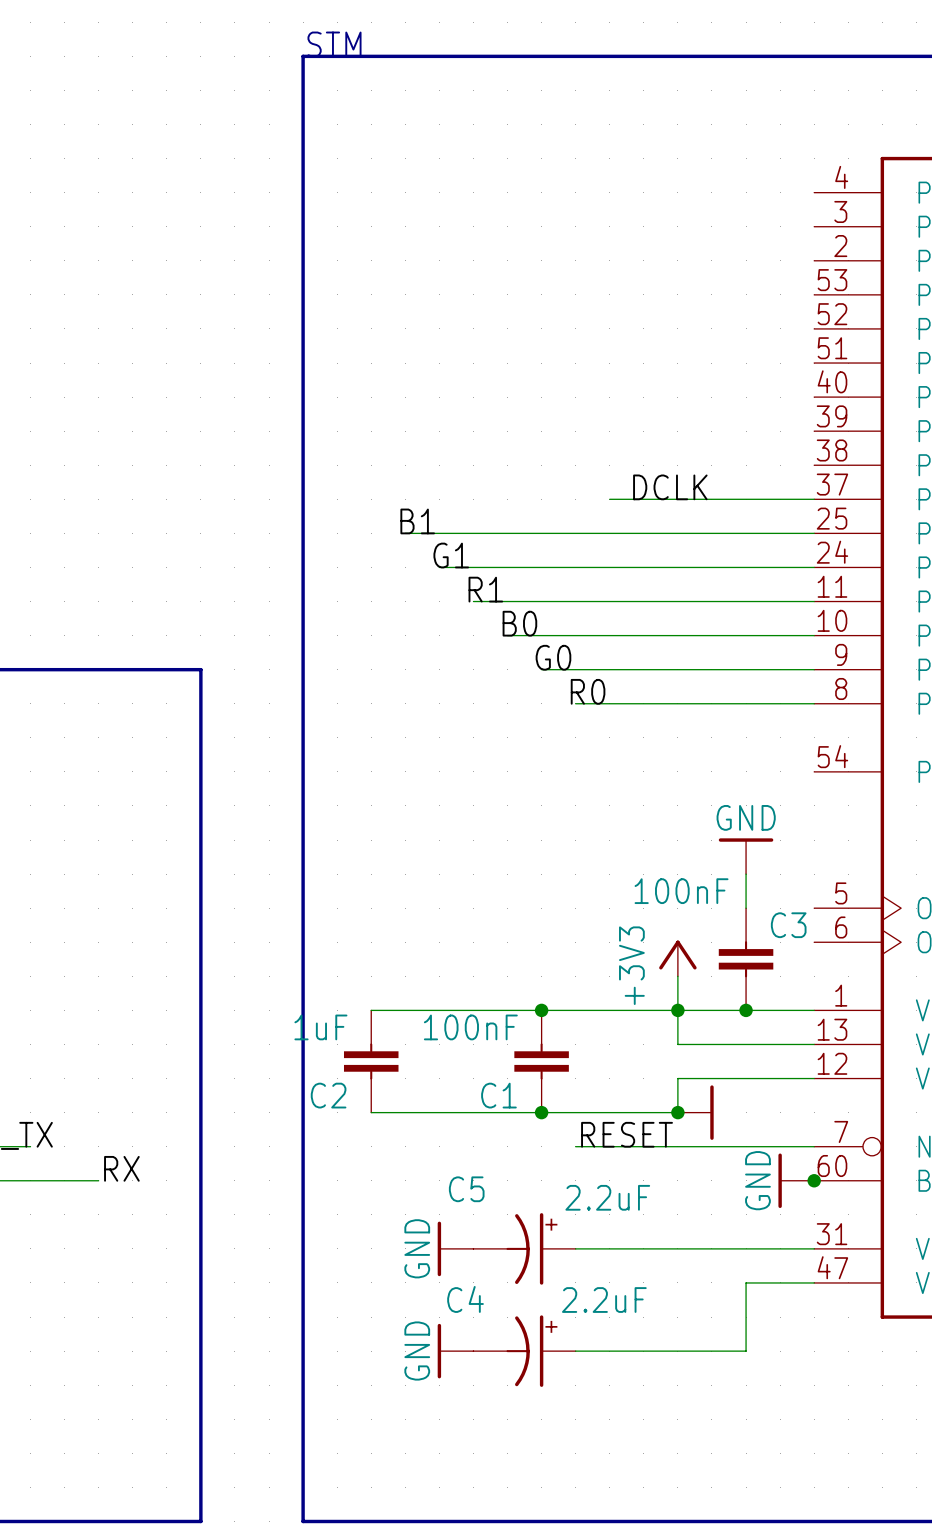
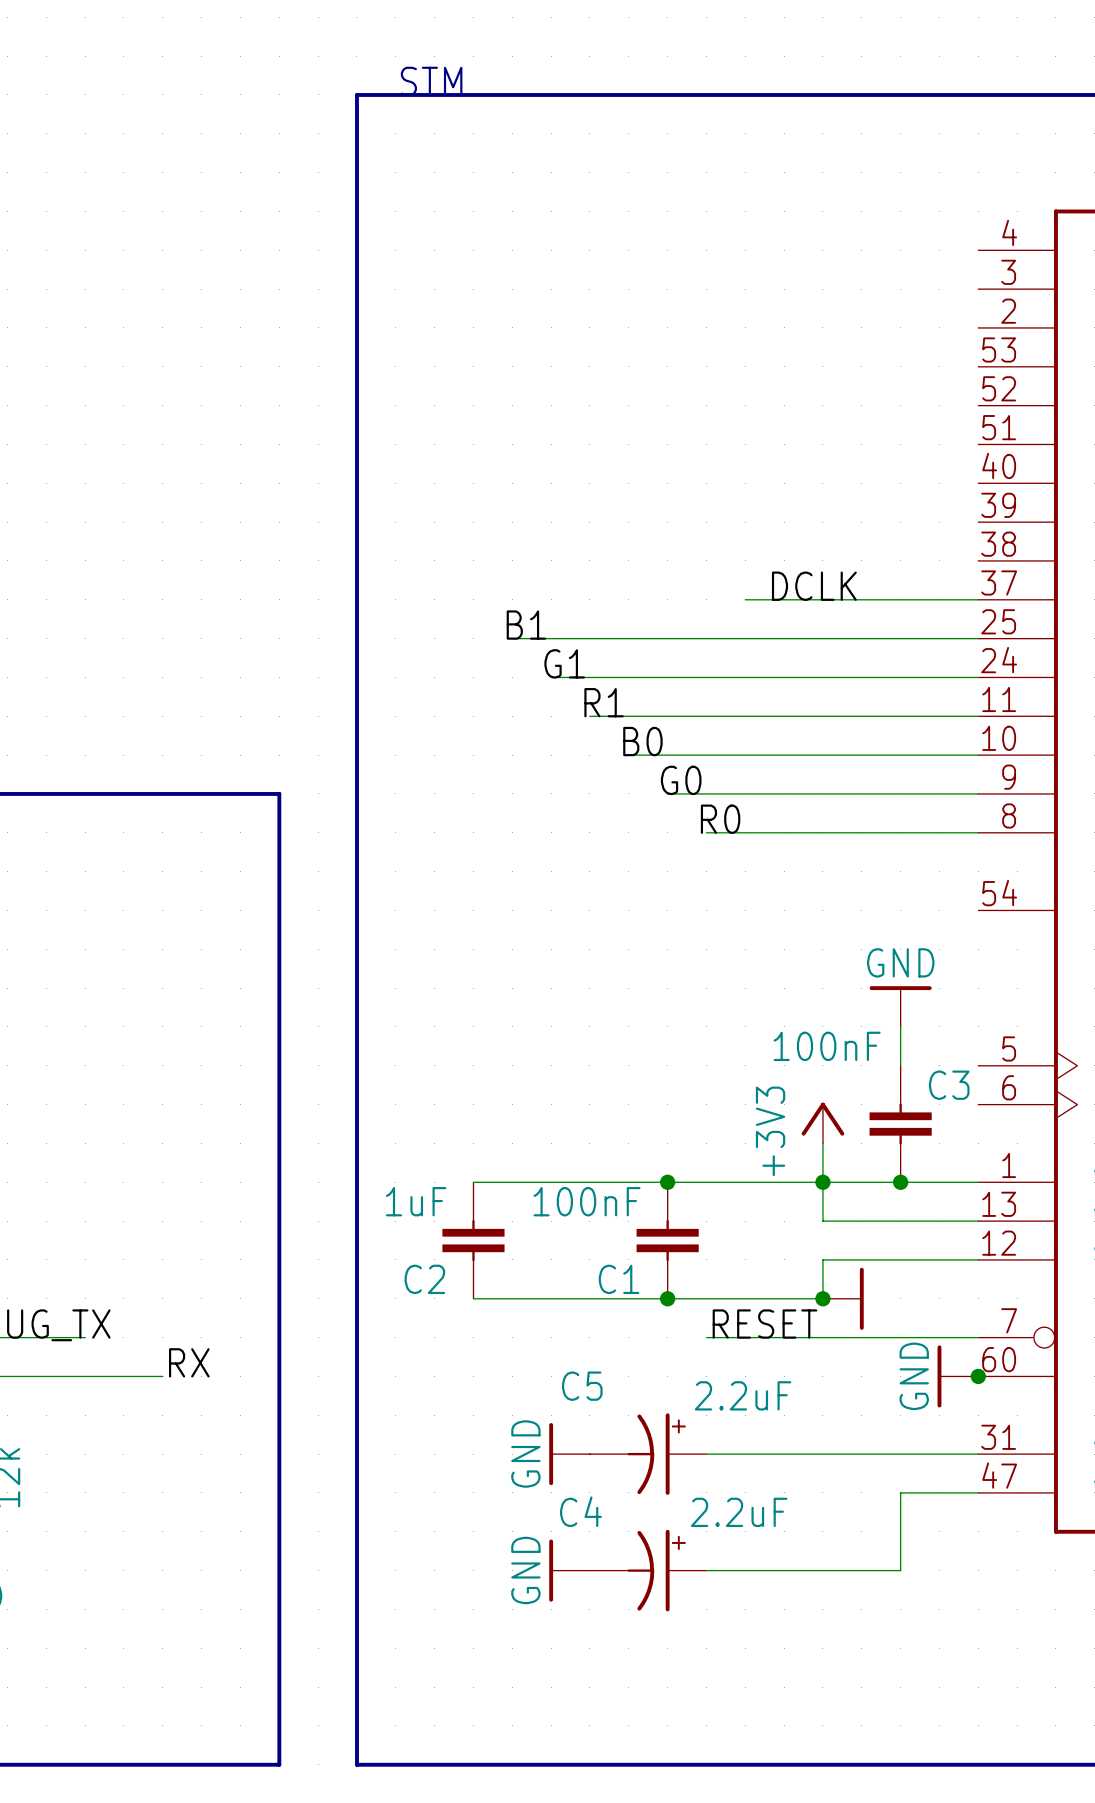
line: (303, 56) (303, 1521) -> (395, 94) (356, 94) (356, 1764) (395, 1764)

